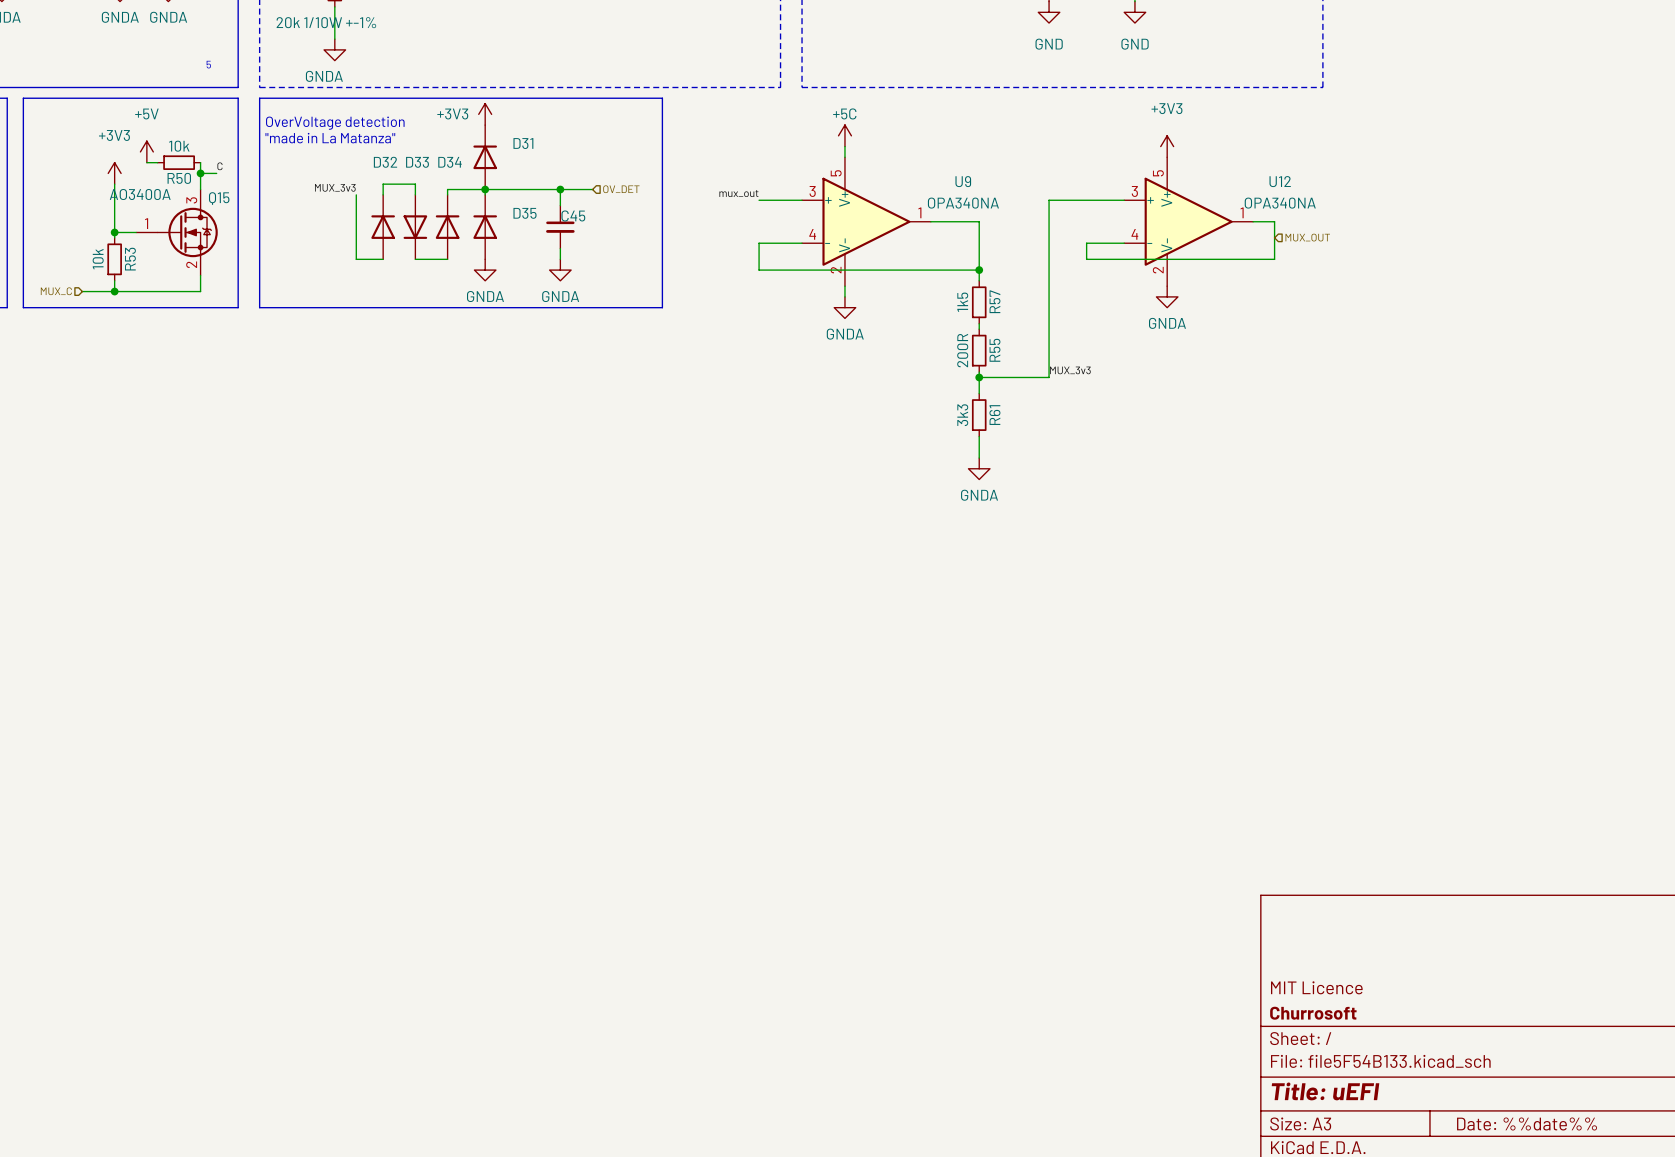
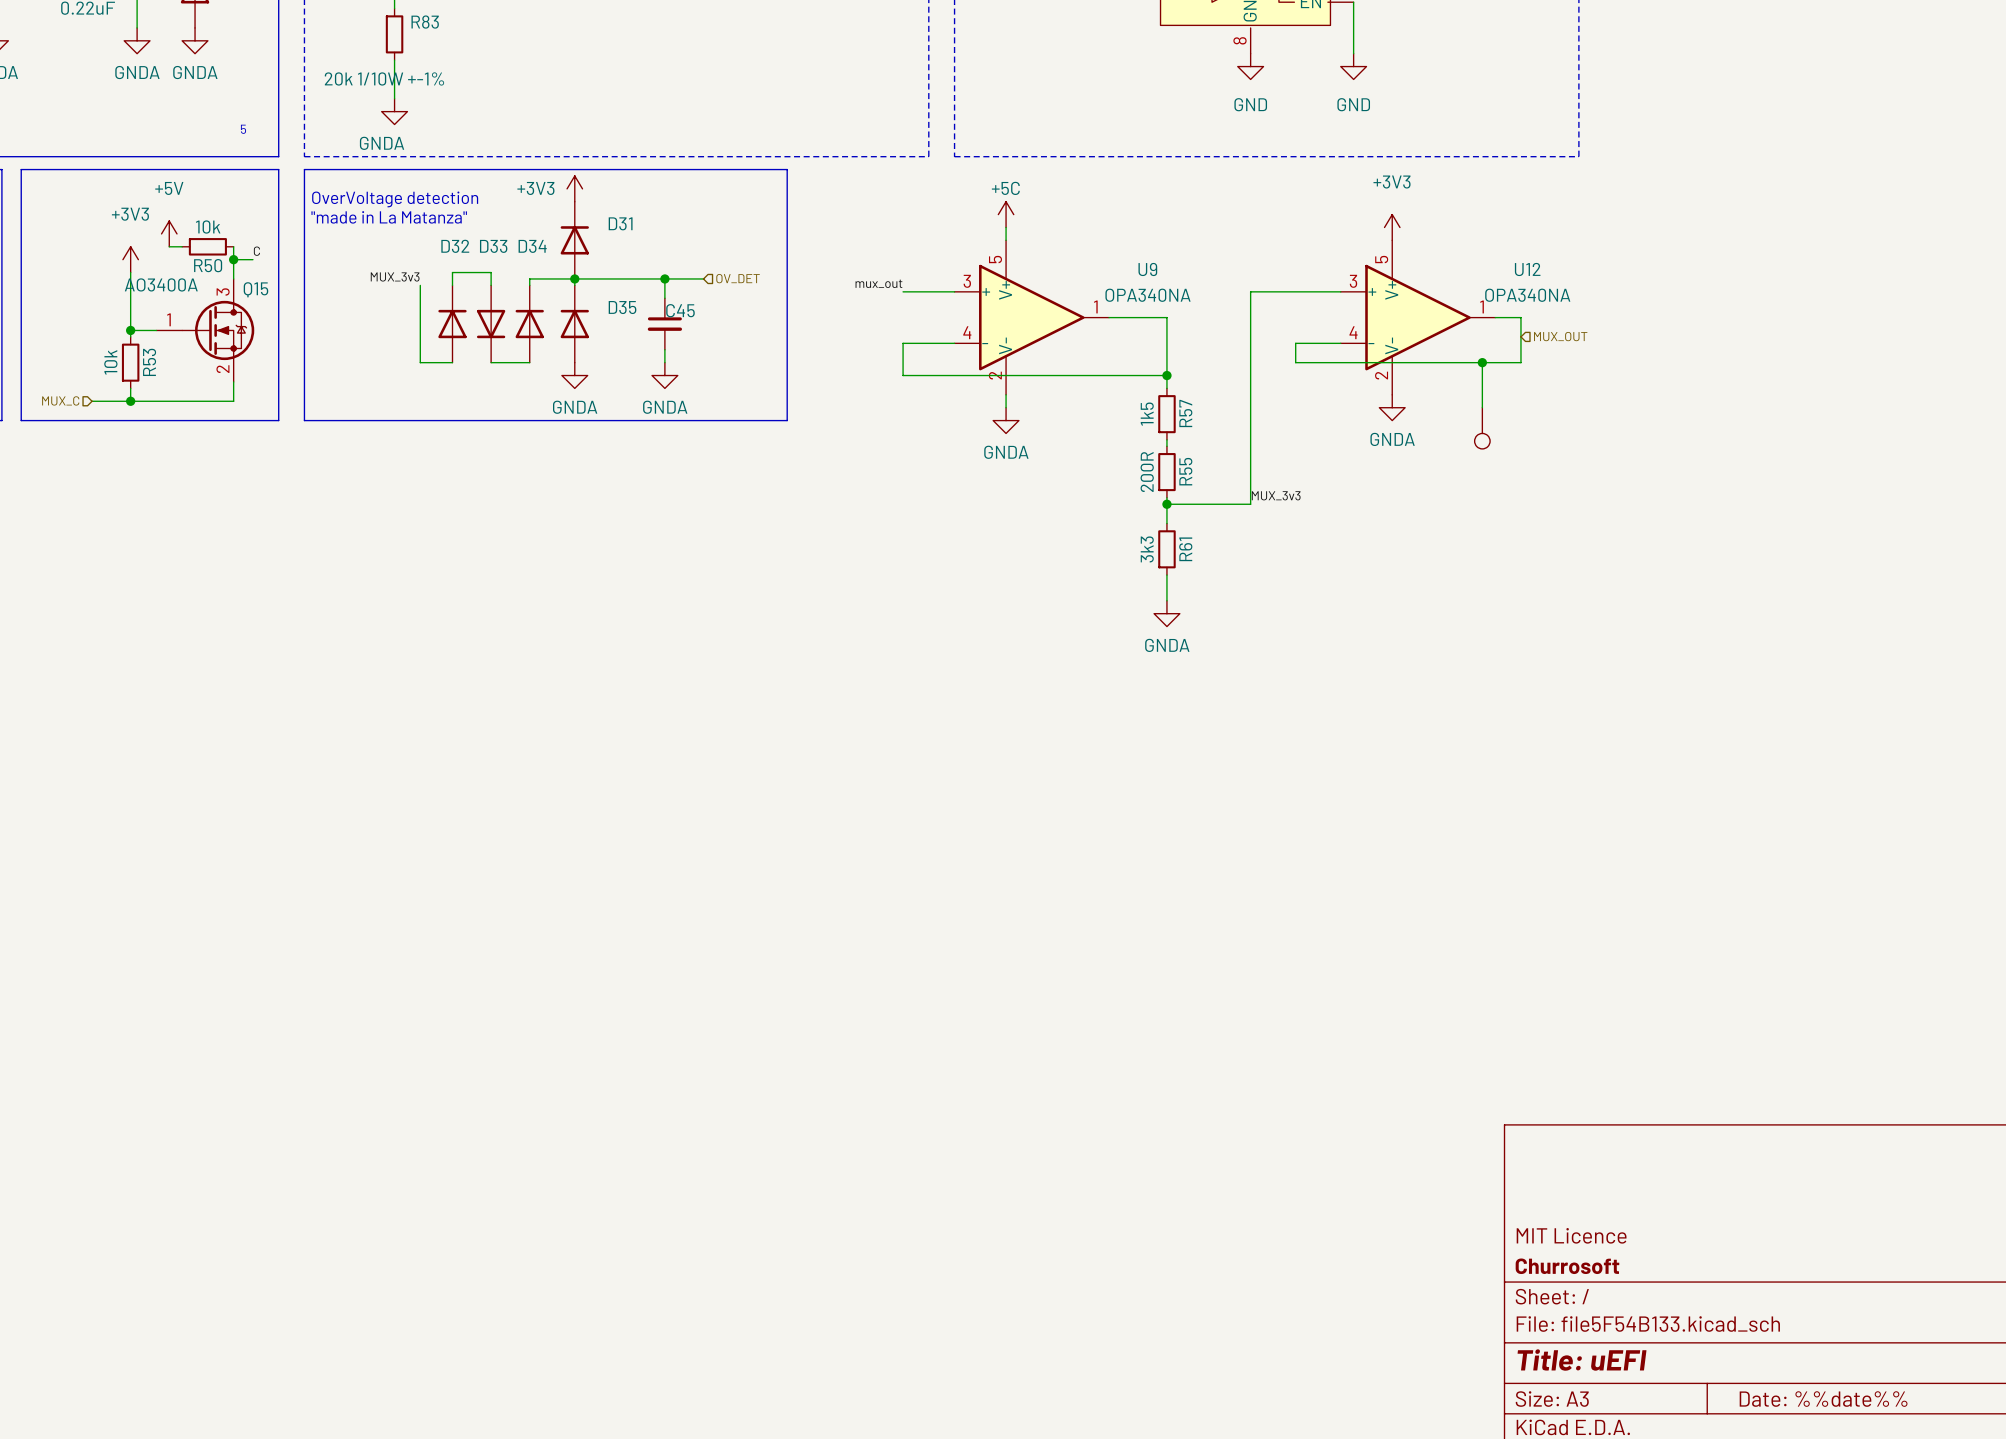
wire: none -> (1482, 362) (1482, 407)
junction: none -> (1482, 362)
part: none -> (1482, 428)

